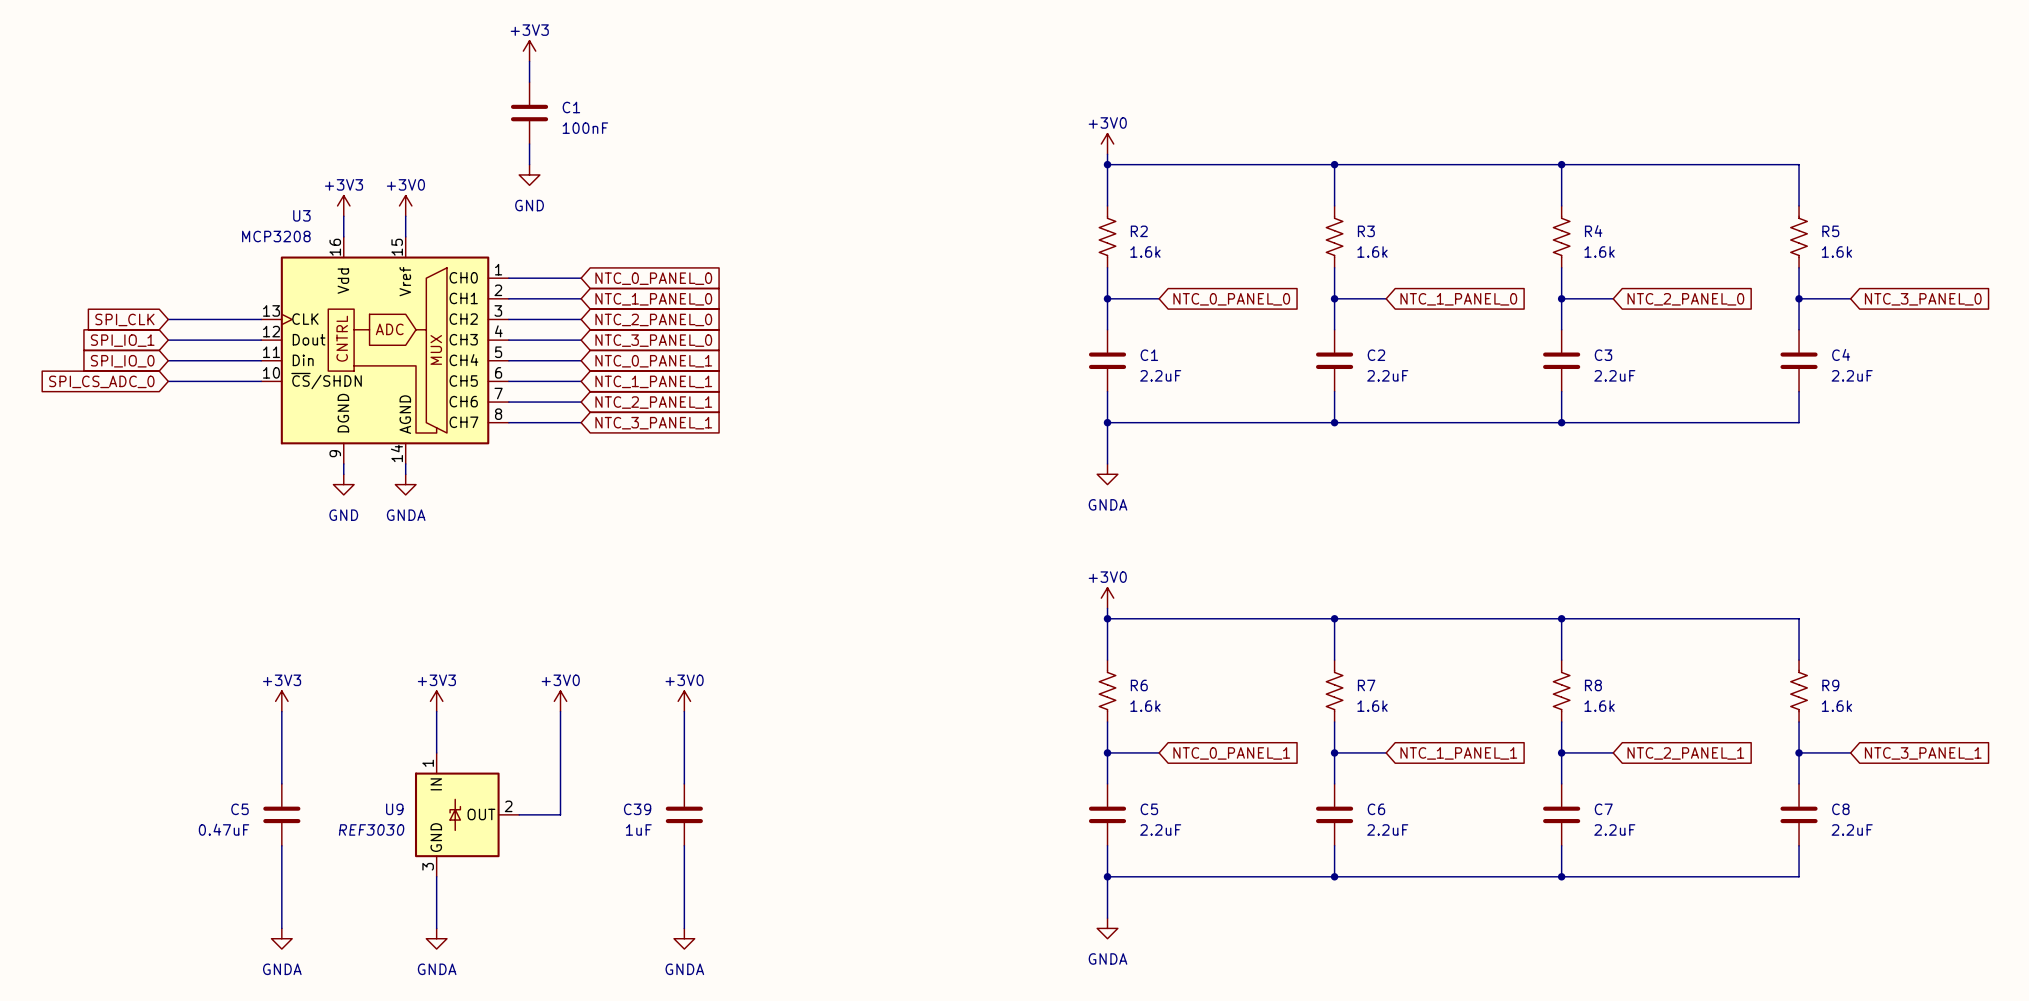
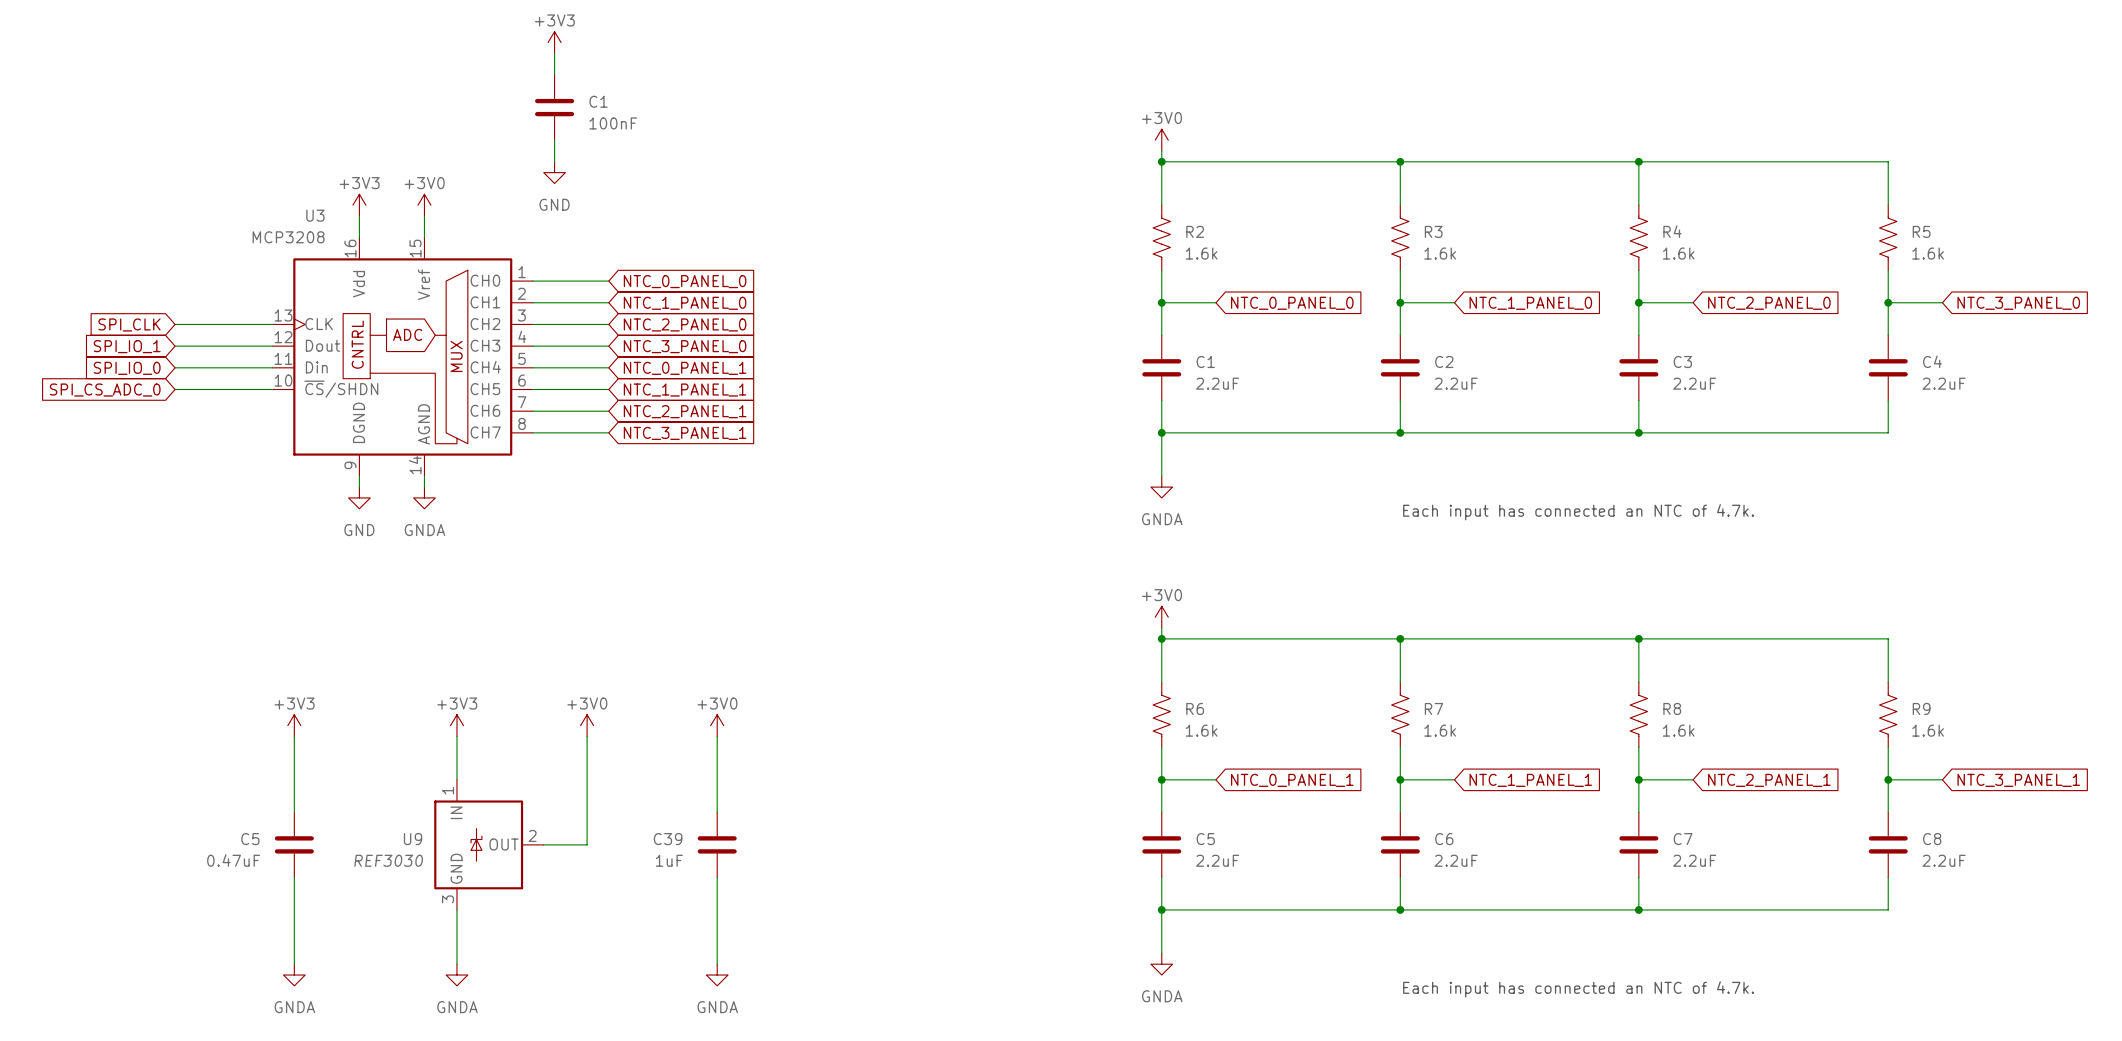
text: none -> Each input has connected an NTC of 4.7k. (1578, 512)
text: none -> Each input has connected an NTC of 4.7k. (1578, 989)

